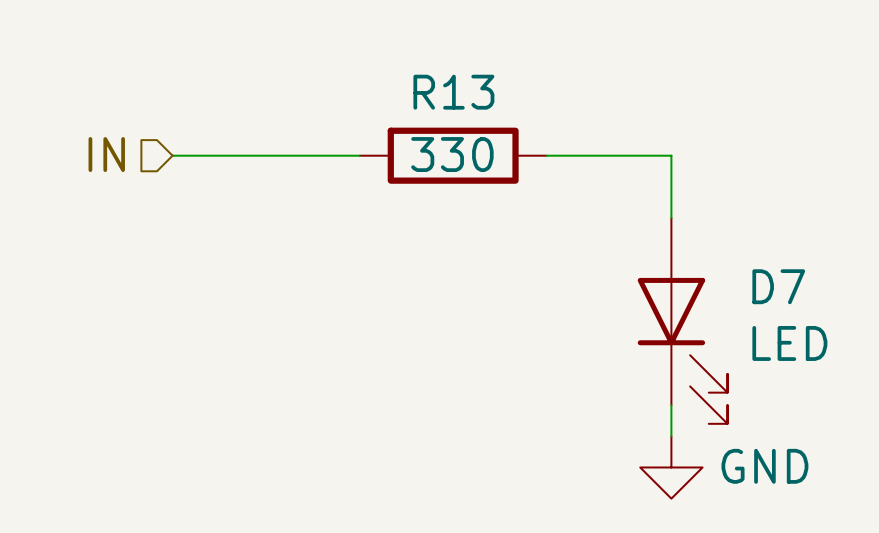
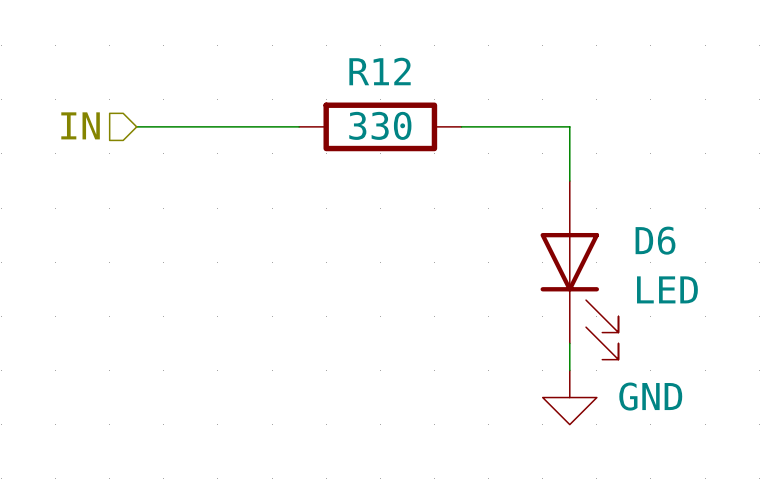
R13 name: R13 (453, 92) -> R12 (380, 71)
D7 name: D7 (778, 286) -> D6 (655, 240)

